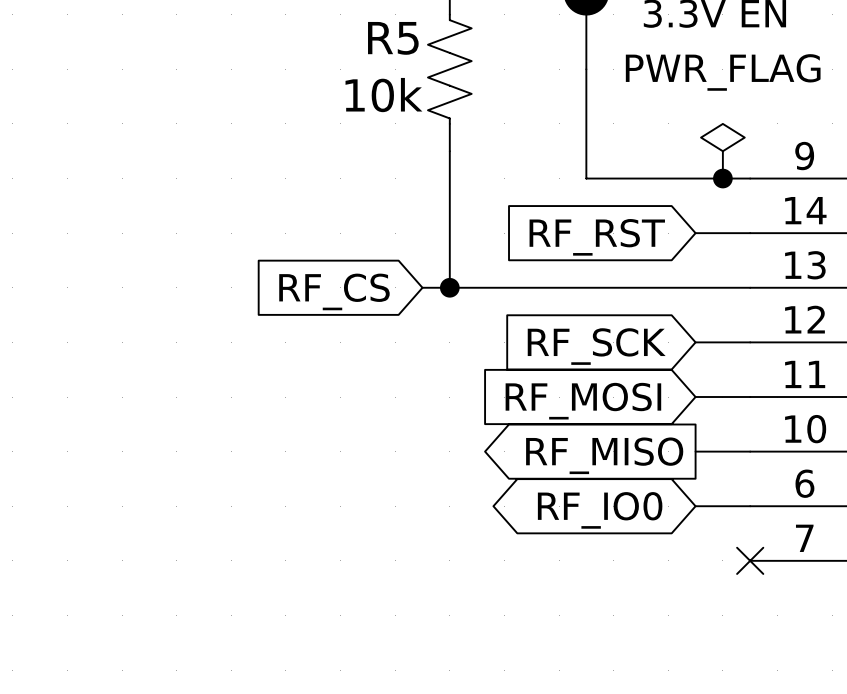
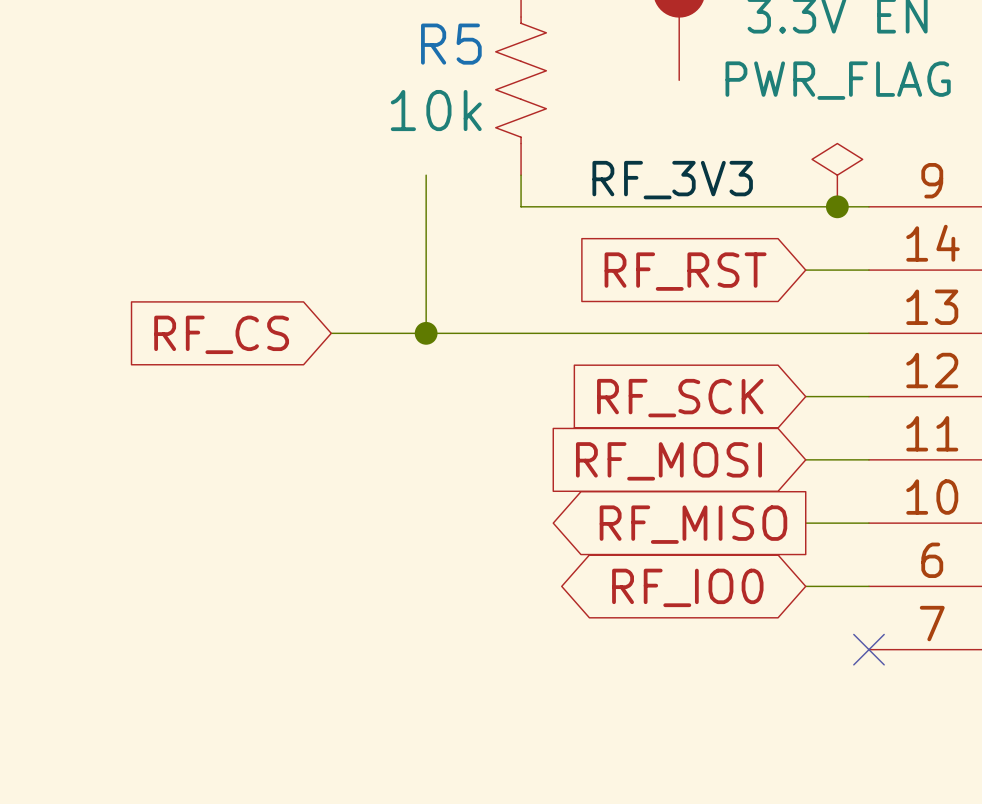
wire: (586, 69) (586, 178) -> (521, 206) (679, 206)
wire: none -> (426, 175) (426, 333)
label: none -> RF_3V3 (672, 180)
wire: (449, 178) (449, 287) -> none
wire: none -> (331, 333) (489, 333)
junction position: (449, 287) -> (426, 333)
global label position: RF_CS (334, 291) -> RF_CS (221, 334)

